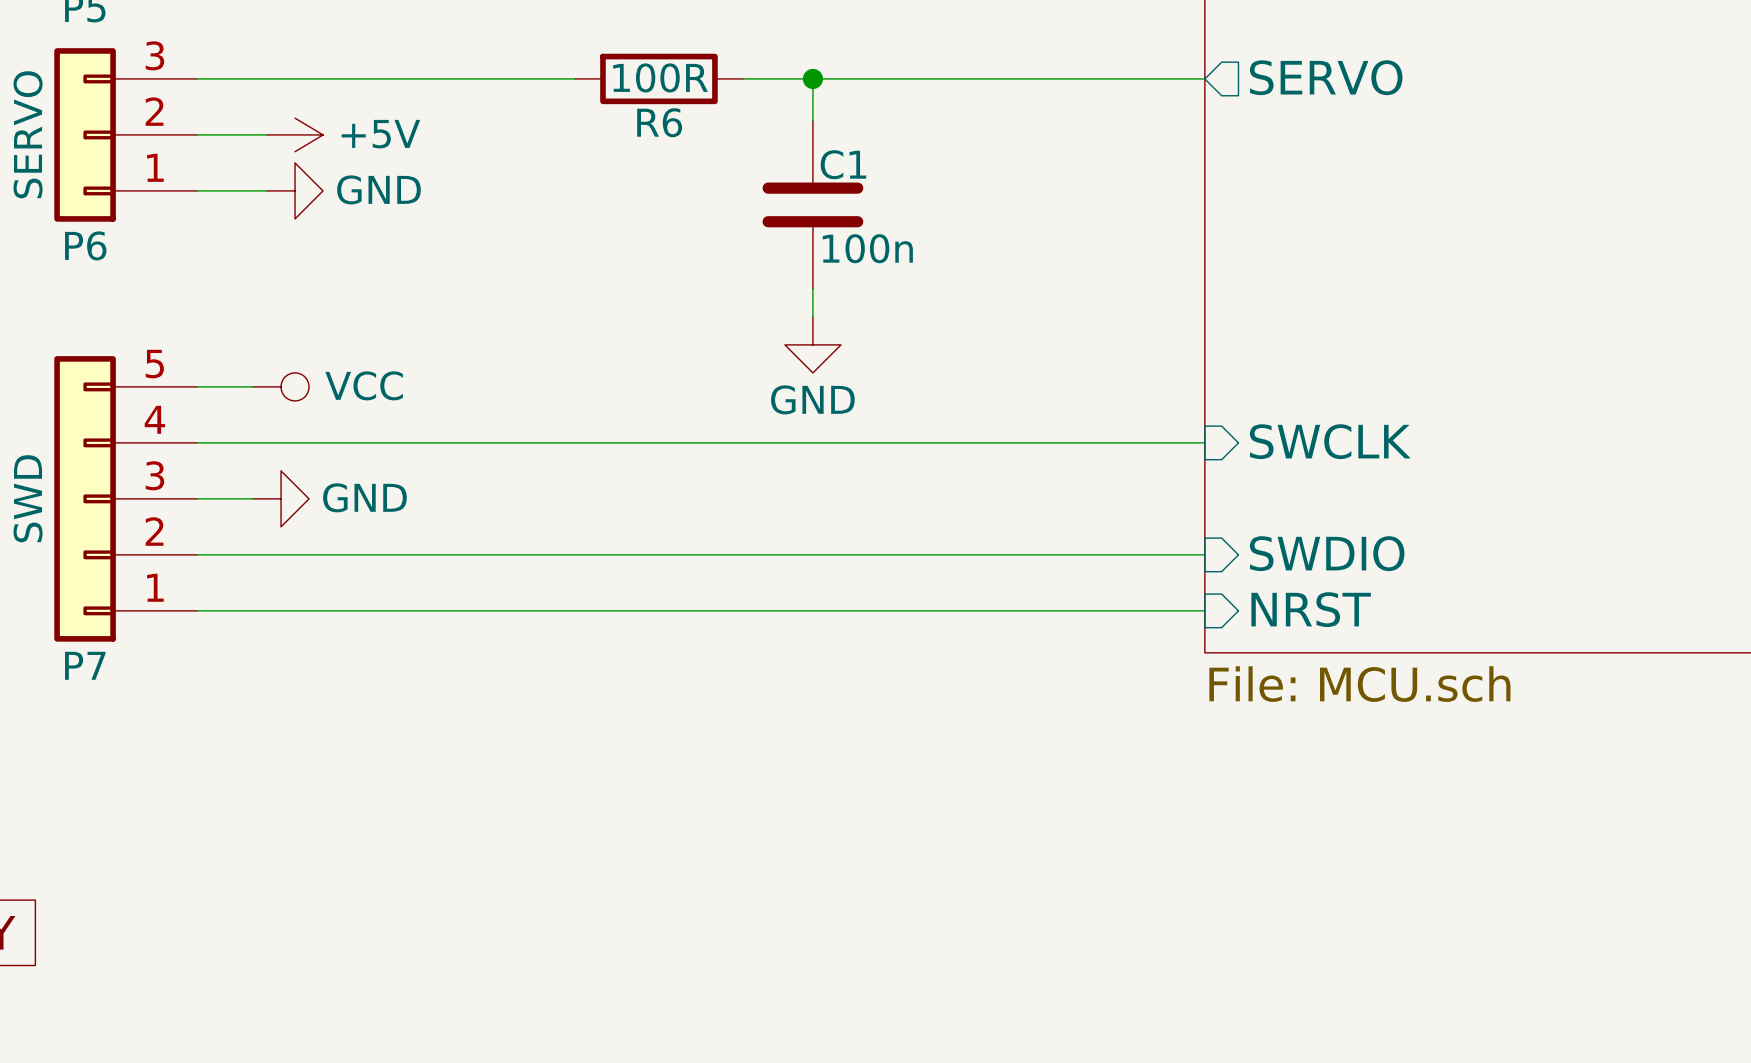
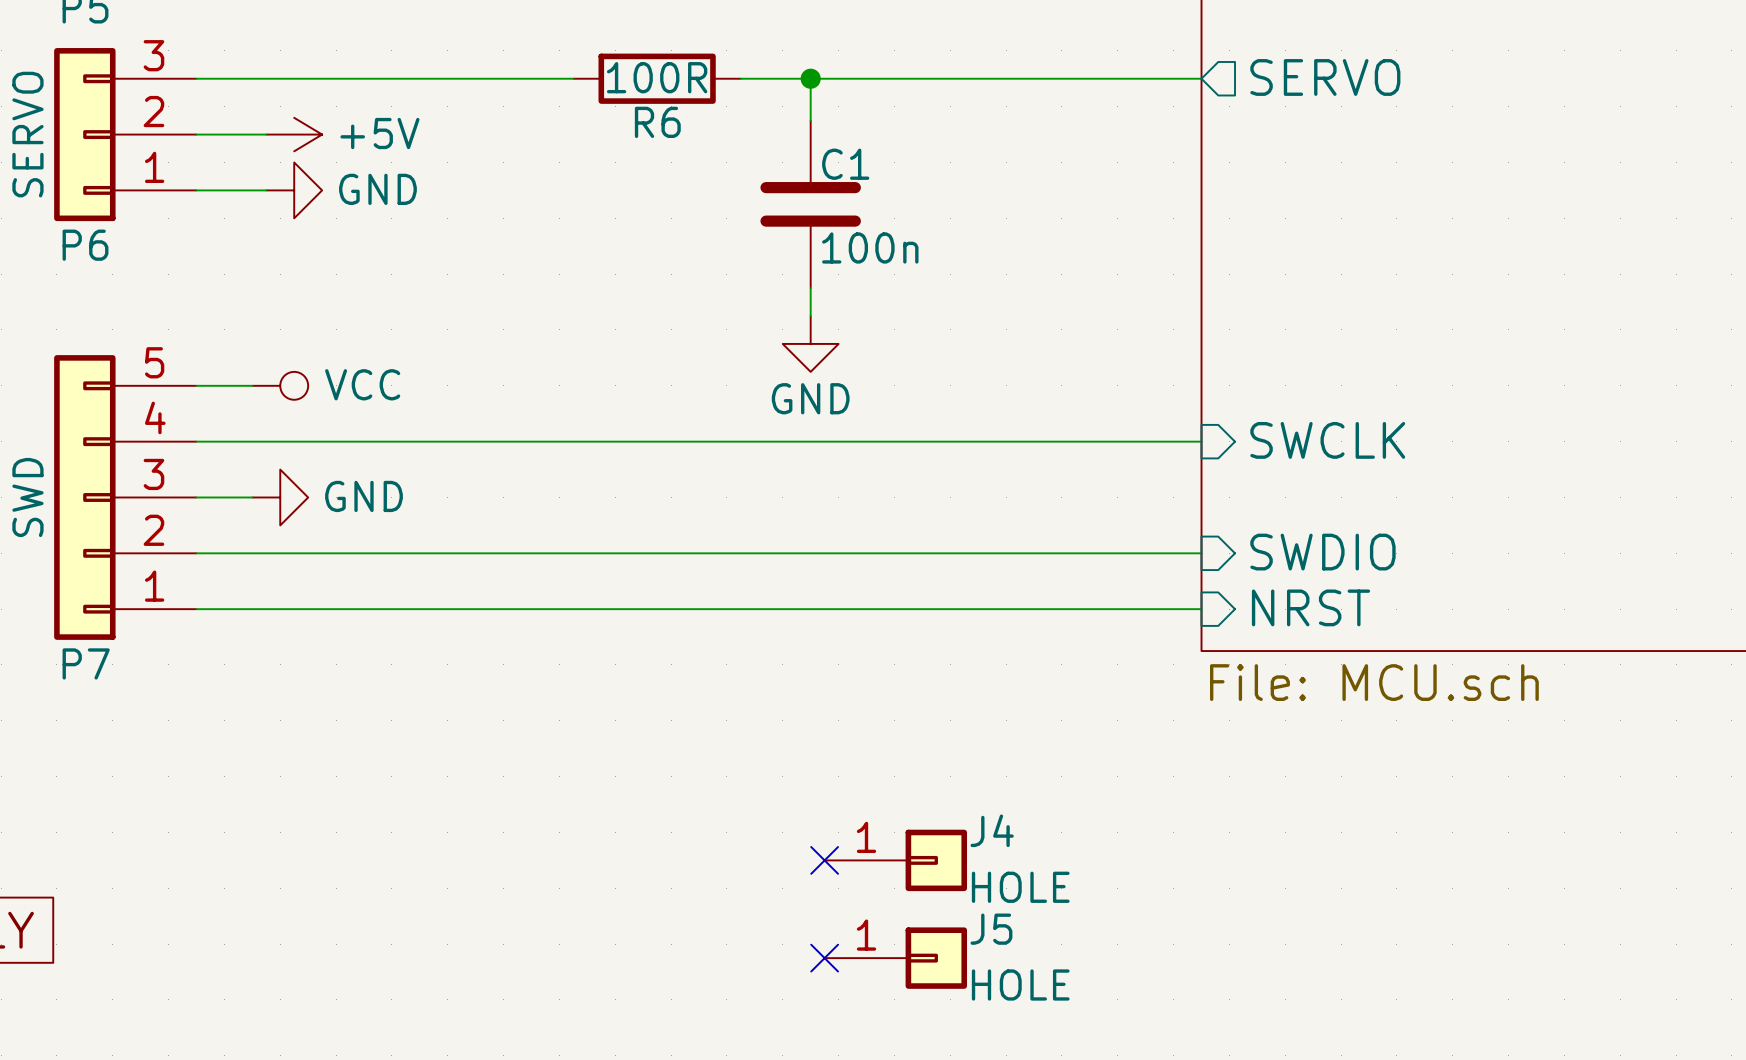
no-connect mark: none -> (824, 860)
J4: none -> HOLE (895, 860)
no-connect mark: none -> (824, 958)
J5: none -> HOLE (895, 958)

